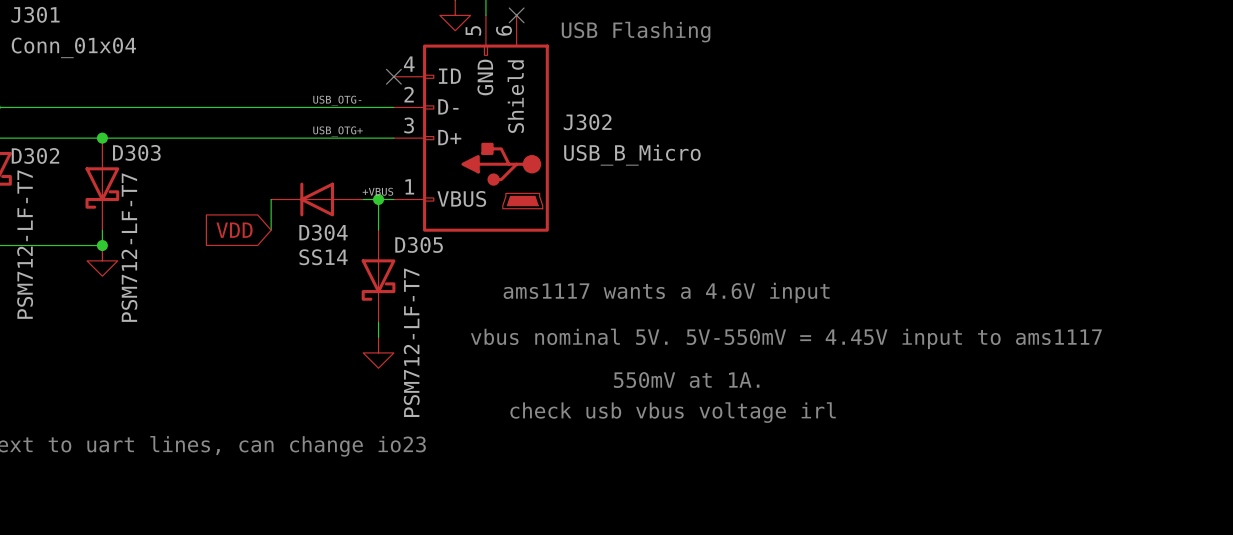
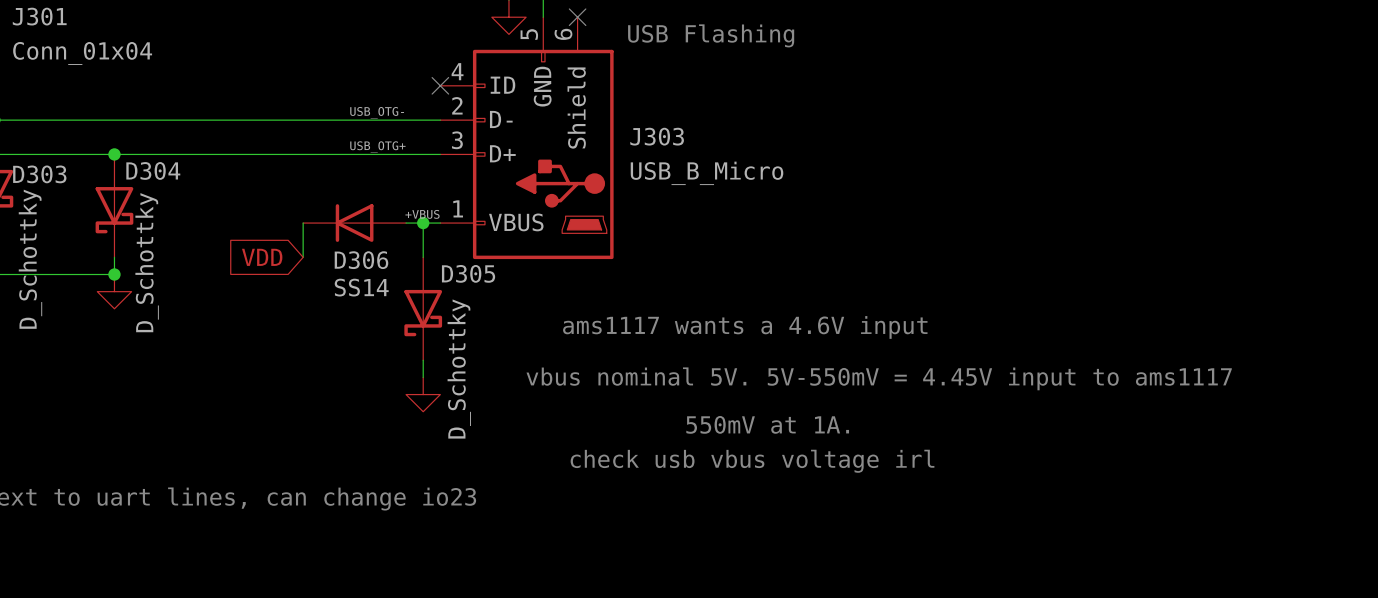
J302 name: J302 (587, 122) -> J303 (657, 136)
D303 name: D303 (136, 152) -> D304 (153, 170)
D302 name: D302 (35, 155) -> D303 (39, 174)
D304 name: D304 (323, 232) -> D306 (361, 260)
D302 value: PSM712-LF-T7 (25, 244) -> D_Schottky (30, 259)
D303 value: PSM712-LF-T7 (129, 247) -> D_Schottky (147, 262)
D305 value: PSM712-LF-T7 (411, 342) -> D_Schottky (459, 369)

